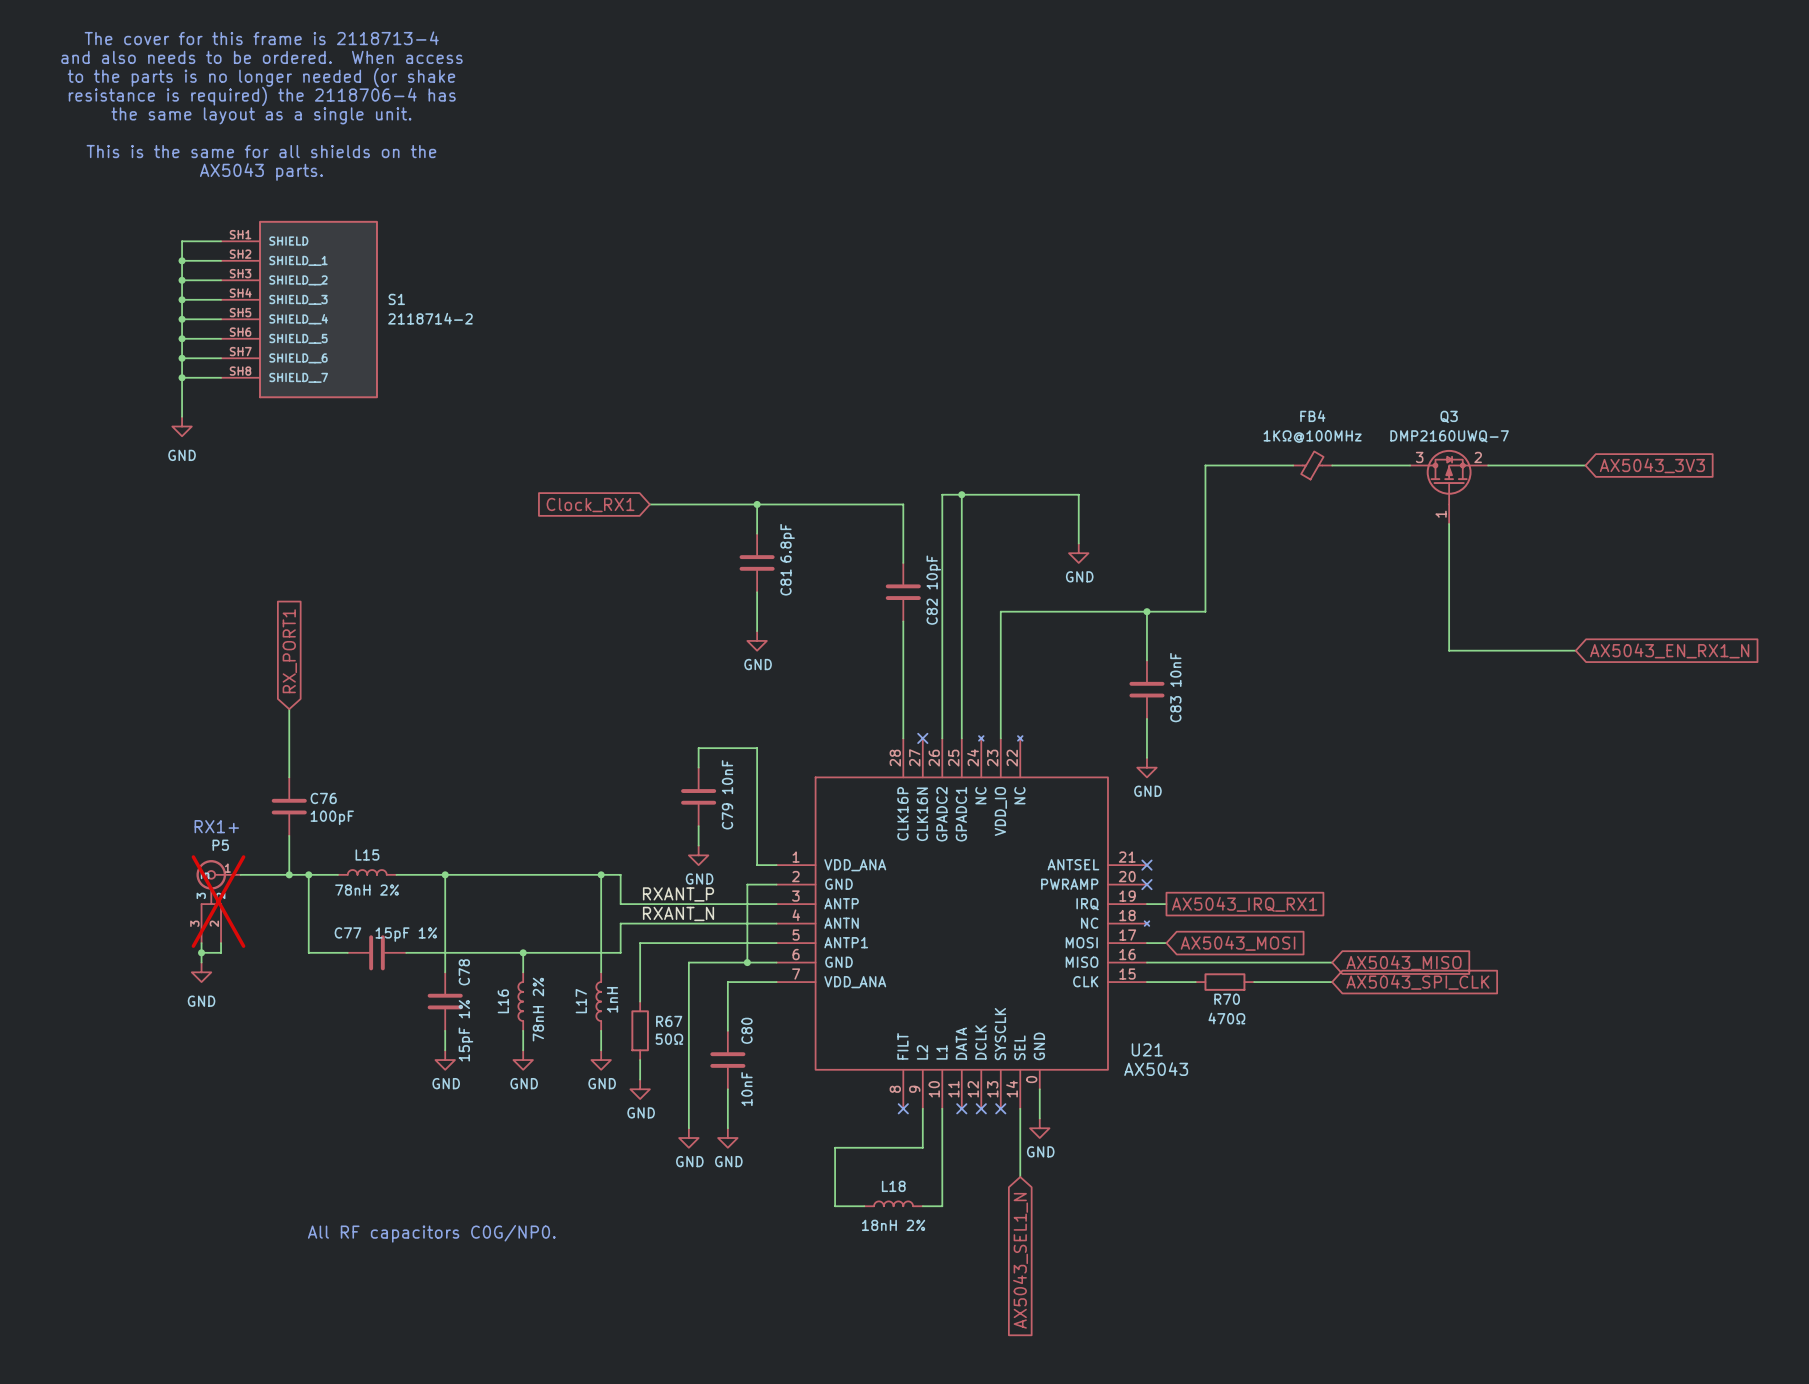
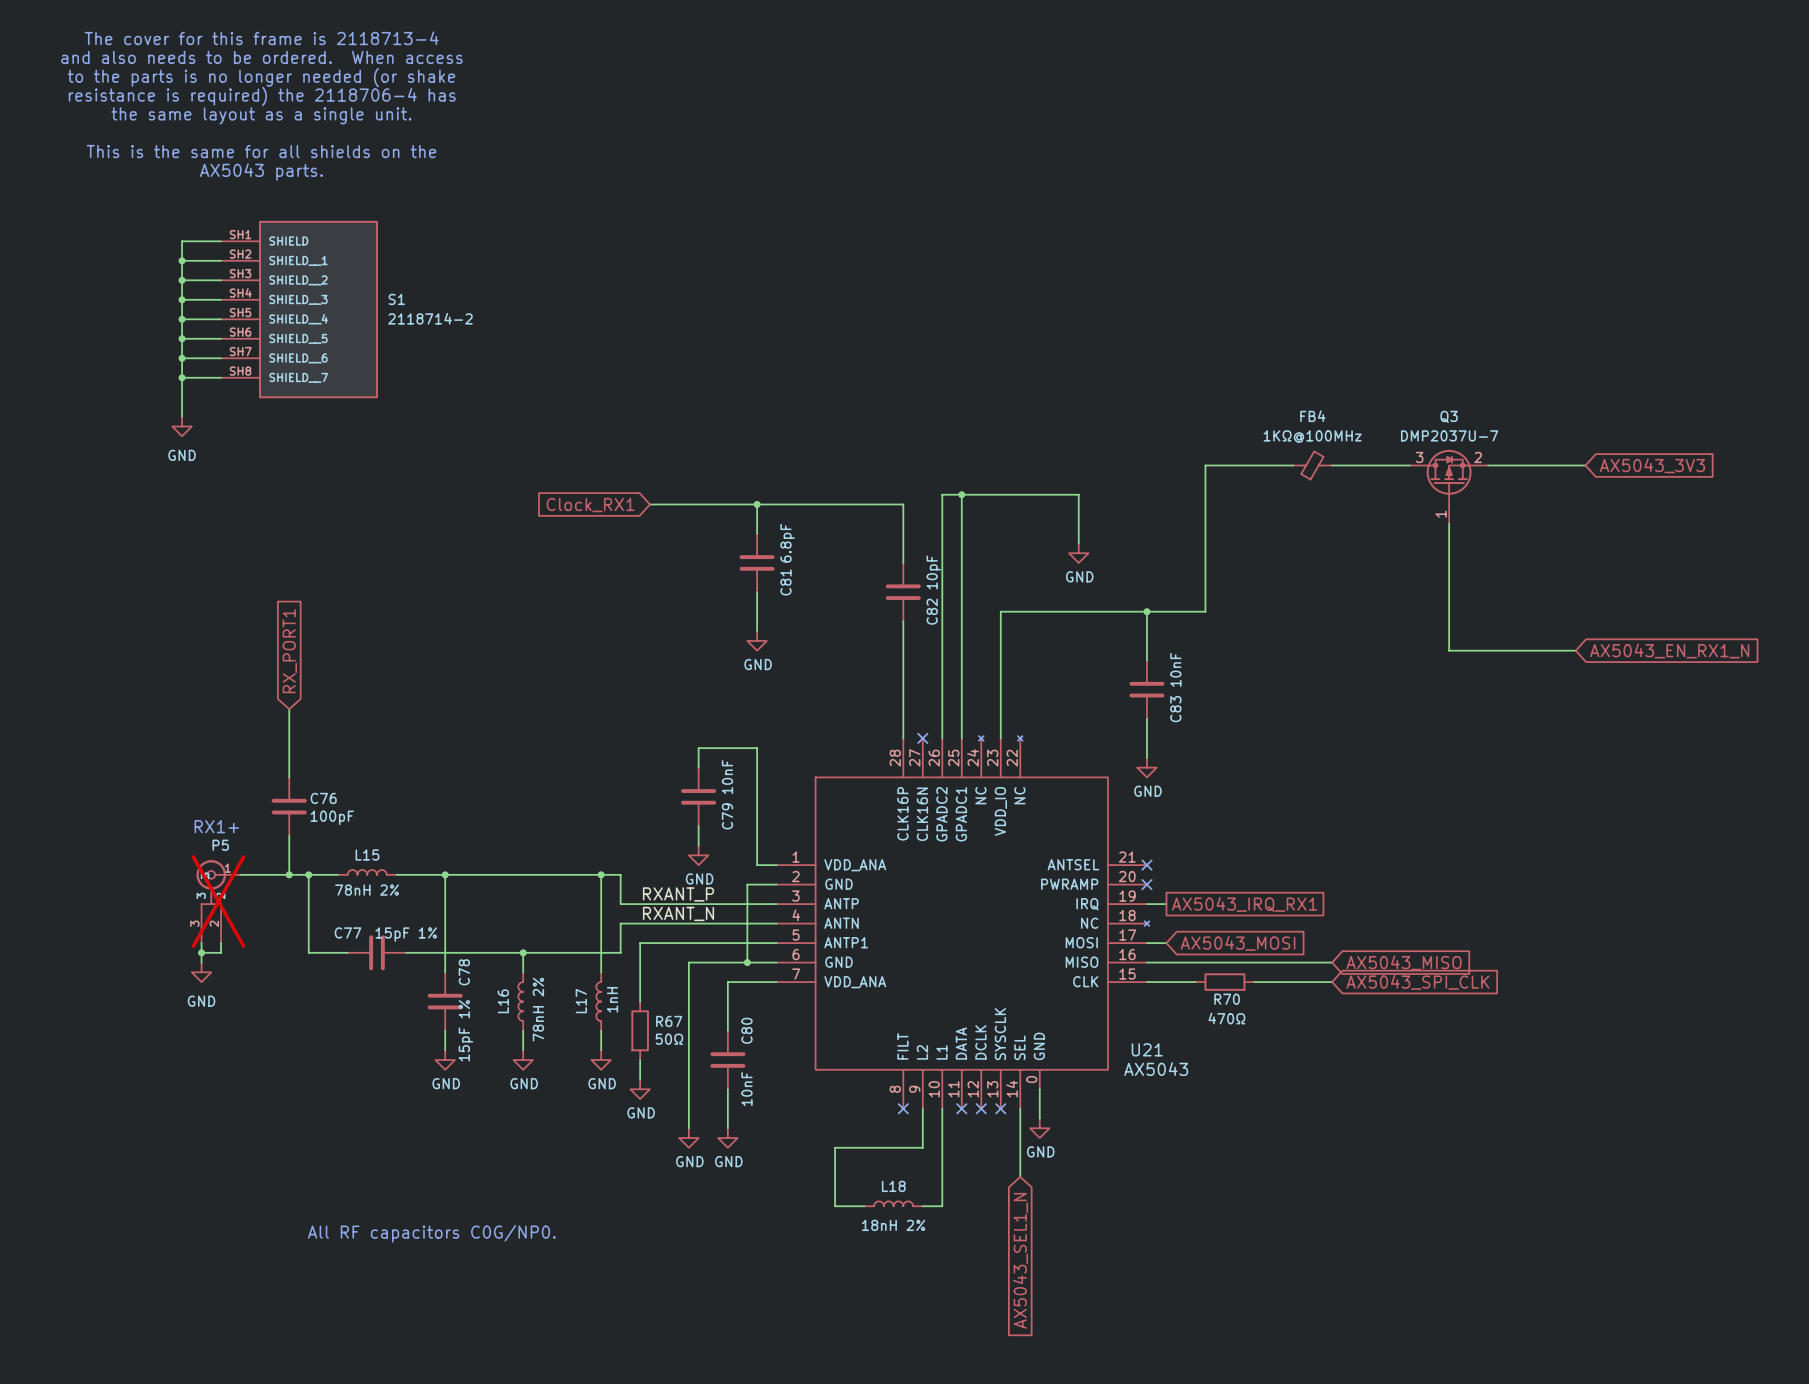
Q3 value: DMP2160UWQ-7 (1449, 436) -> DMP2037U-7 (1449, 435)

